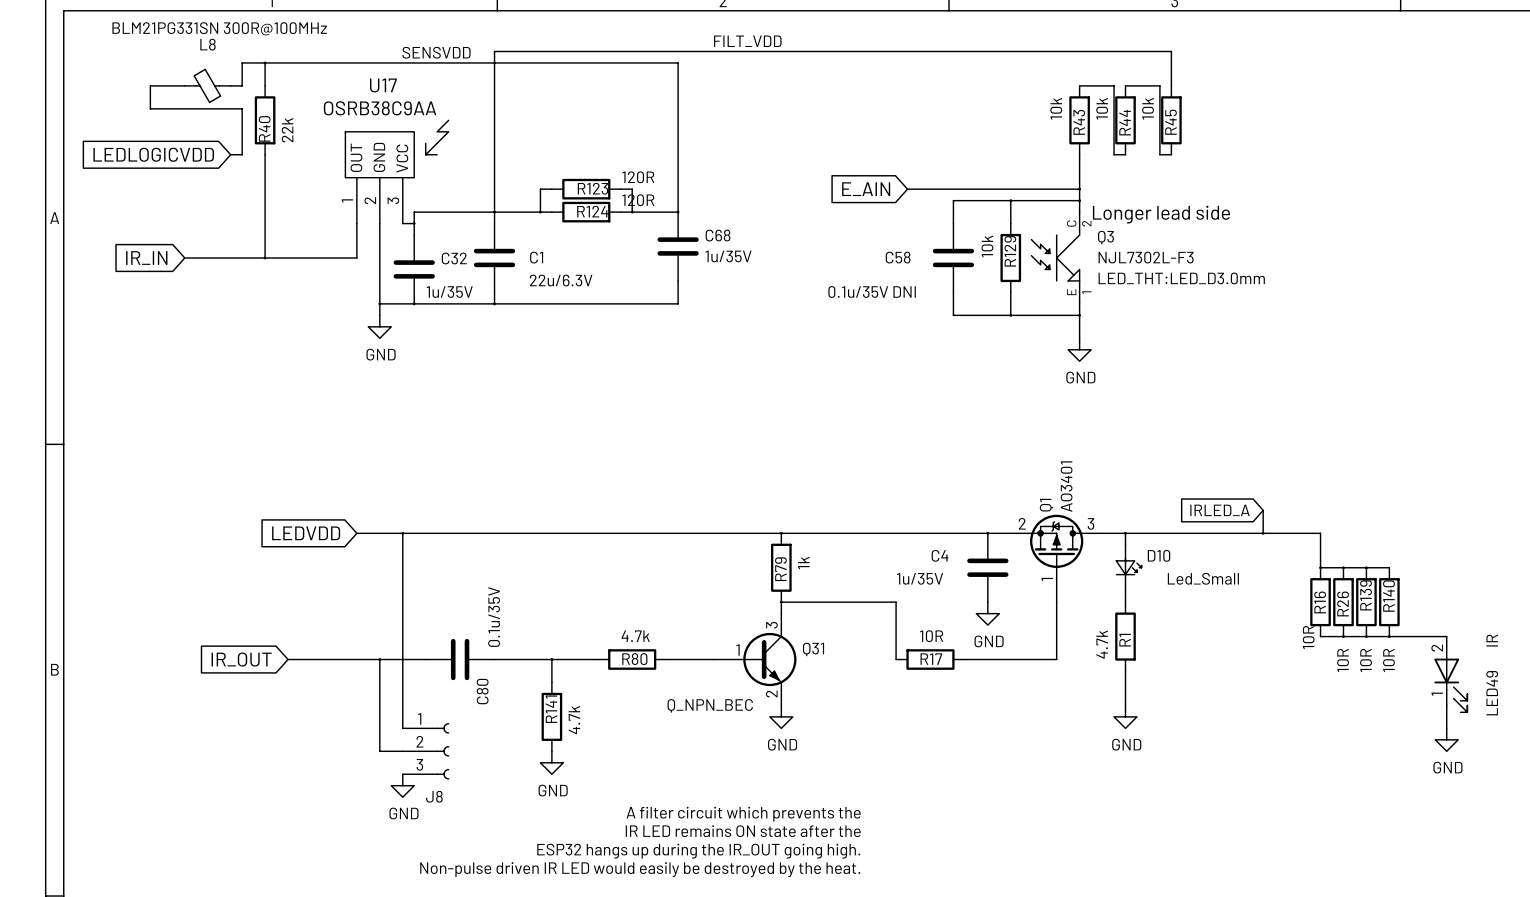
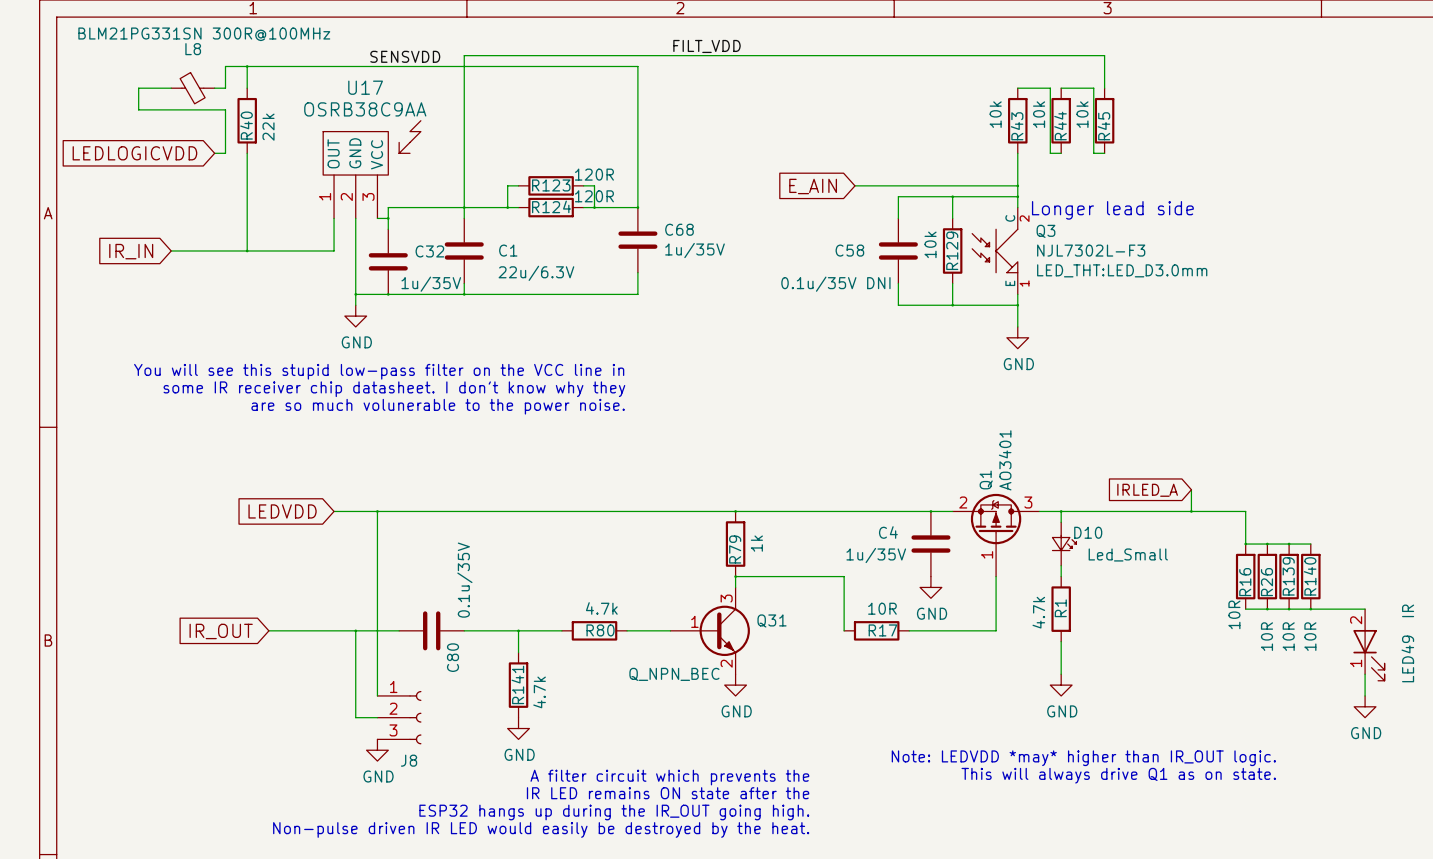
text: none -> You will see this stupid low-pass filter on the VCC line in (379, 371)
text: none -> some IR receiver chip datasheet. I don't know why they (394, 389)
text: none -> are so much volunerable to the power noise. (438, 406)
text: none -> Note: LEDVDD *may* higher than IR_OUT logic. (1083, 758)
text: none -> This will always drive Q1 as on state. (1118, 775)

